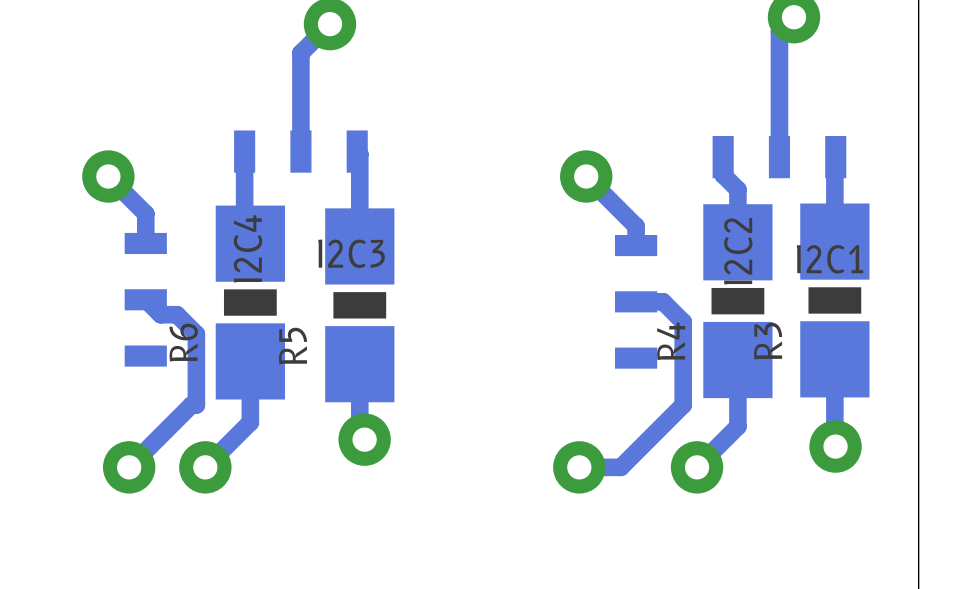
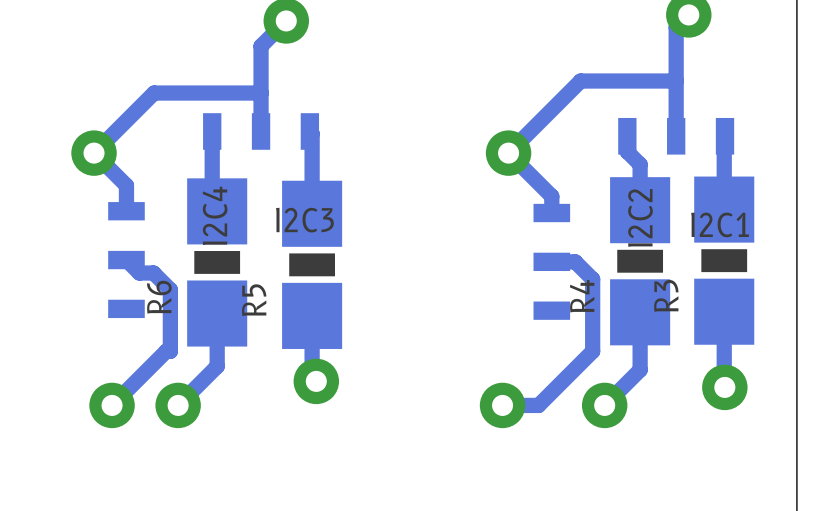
track: none -> (676, 81) (580, 81) (508, 153)
track: none -> (261, 93) (154, 93) (94, 153)

